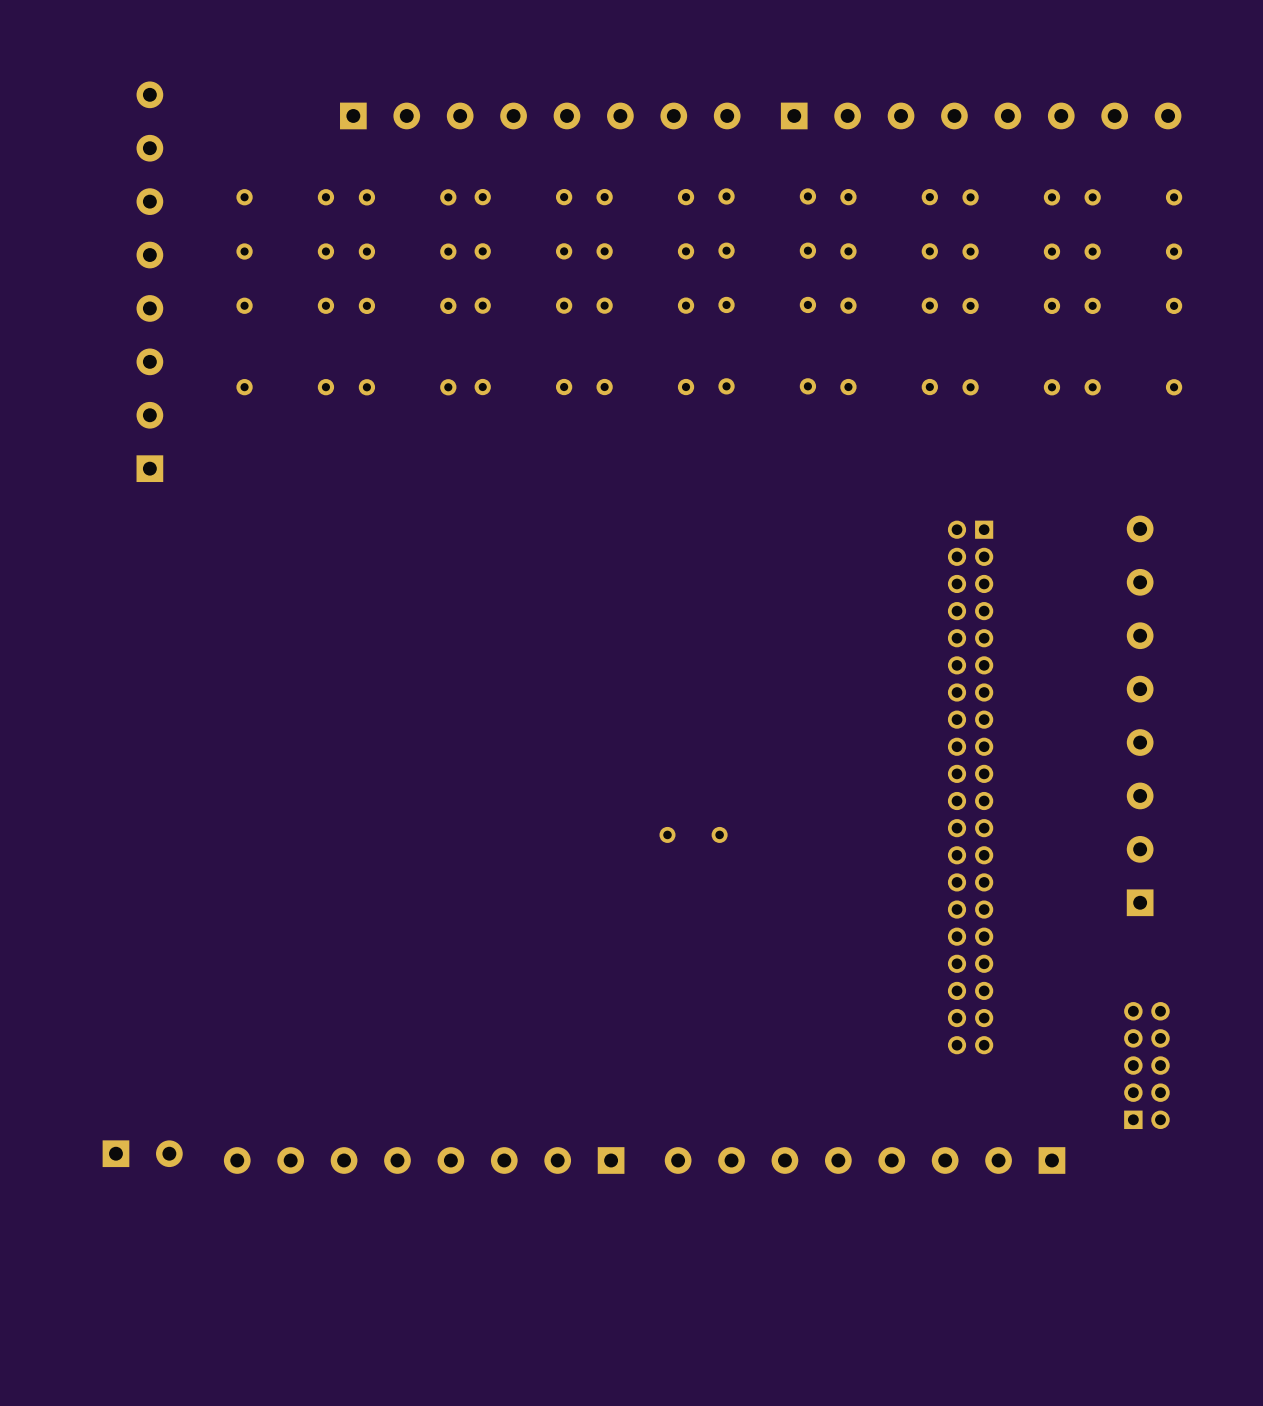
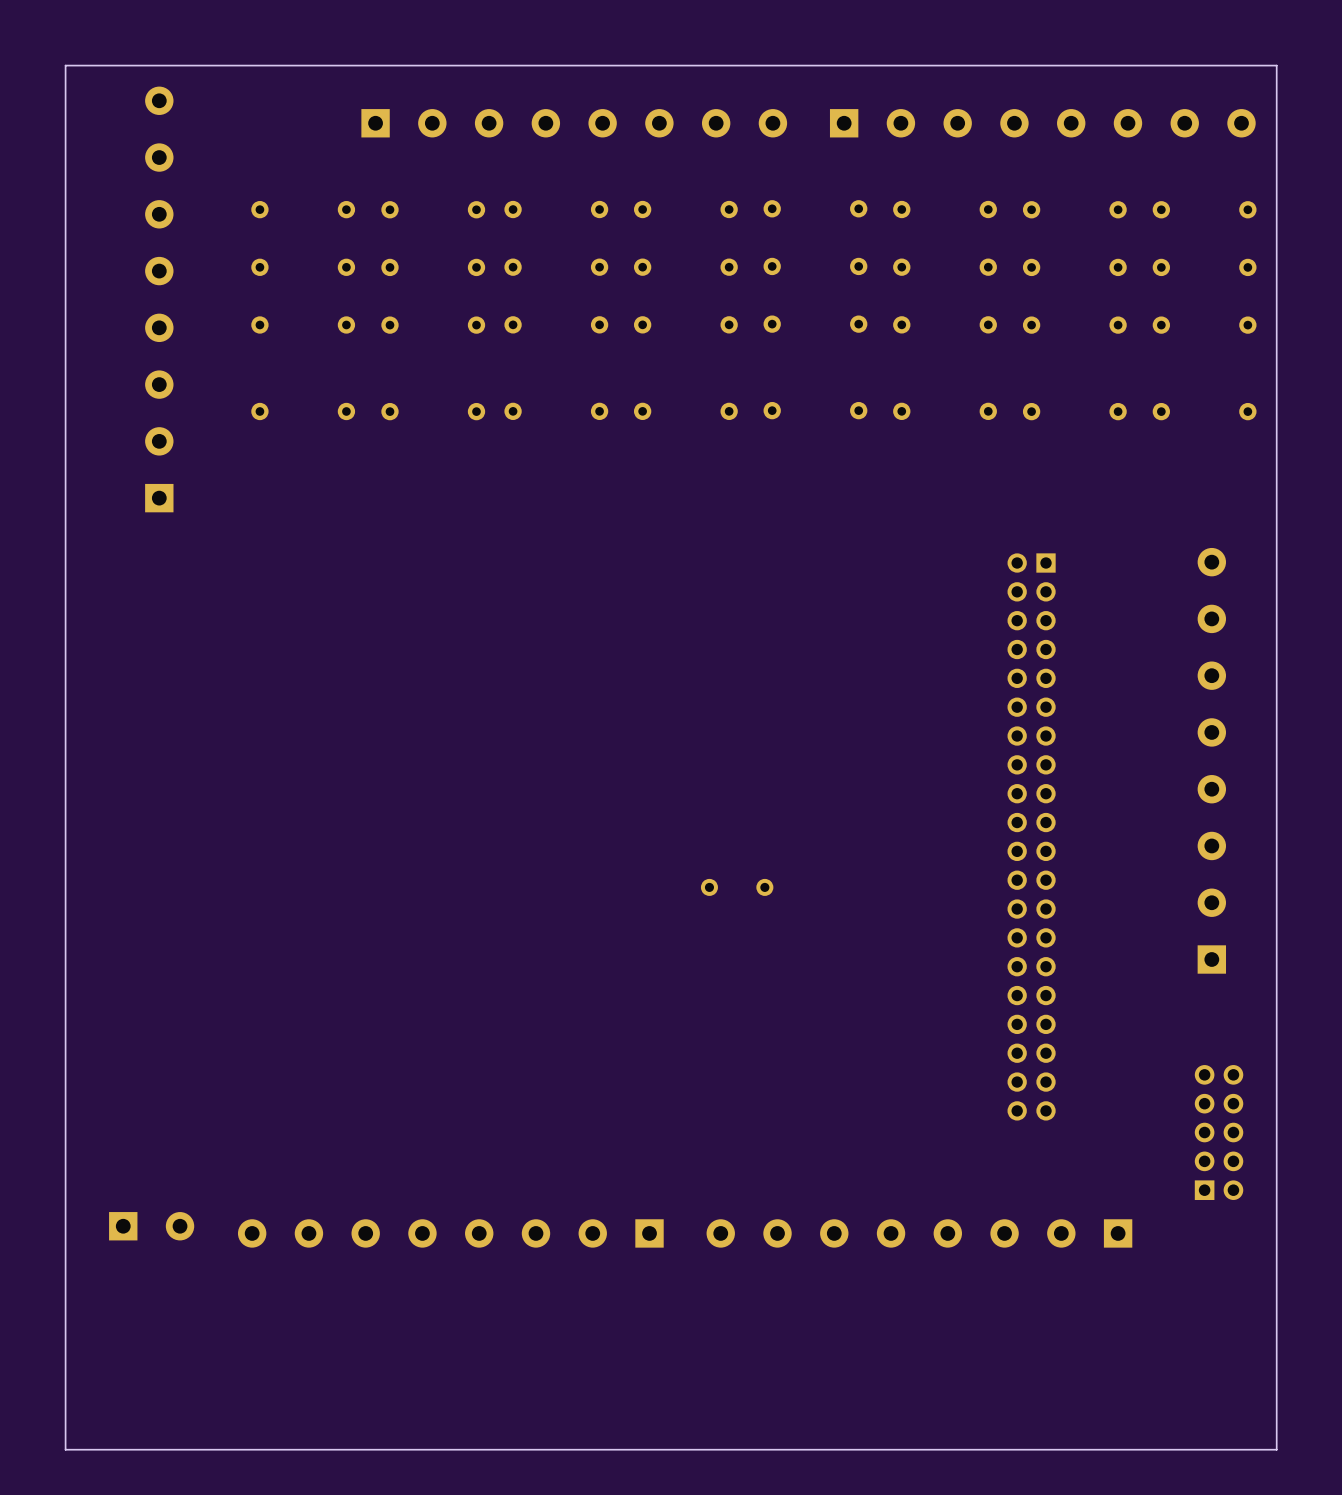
board edge: none -> (1276, 65) (65, 65) (65, 1449) (1276, 1449) (1276, 65)

